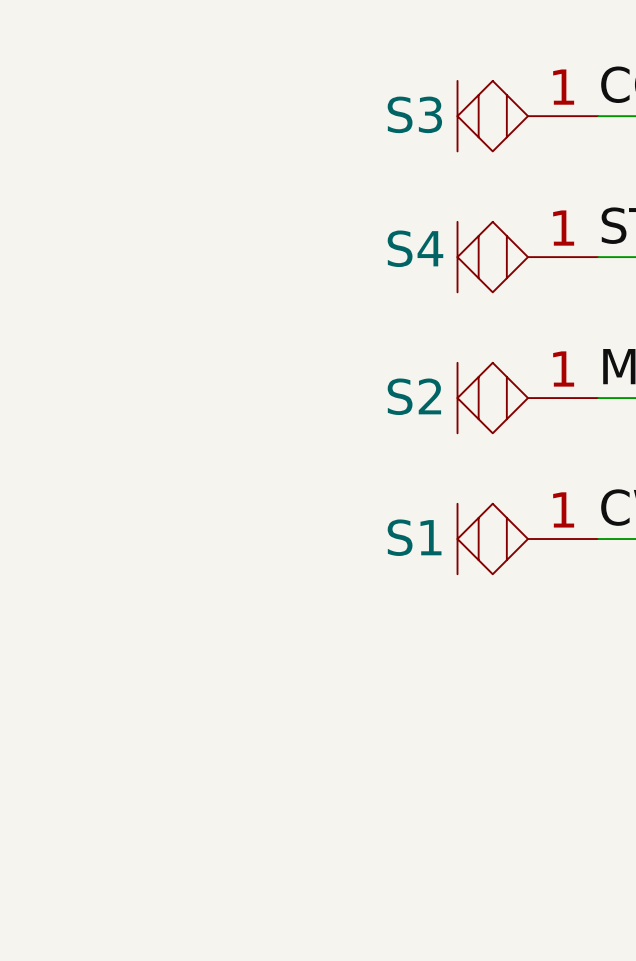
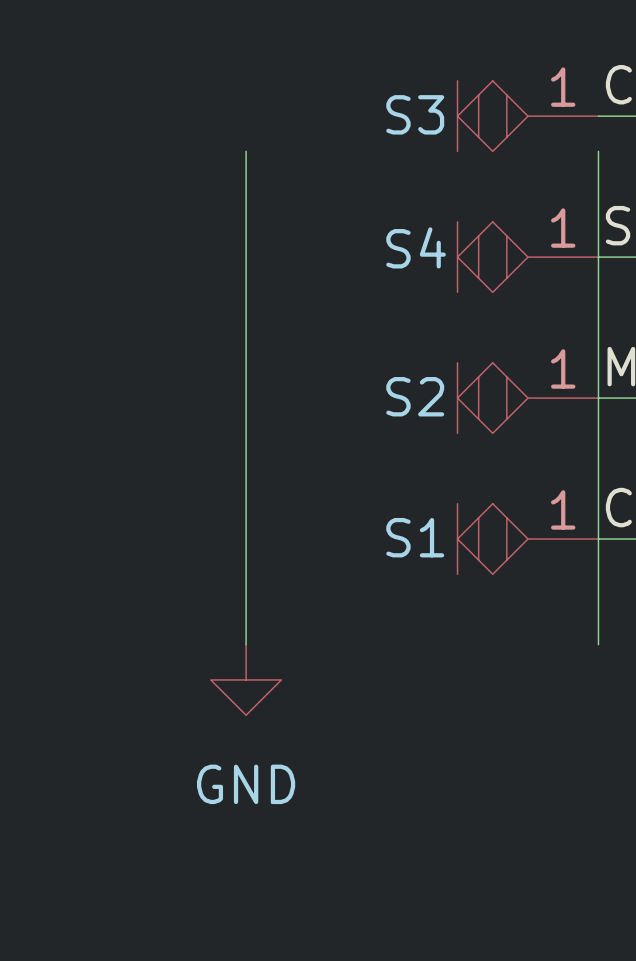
wire: none -> (246, 151) (246, 644)
wire: none -> (598, 151) (598, 644)
power symbol: none -> GND (246, 679)

